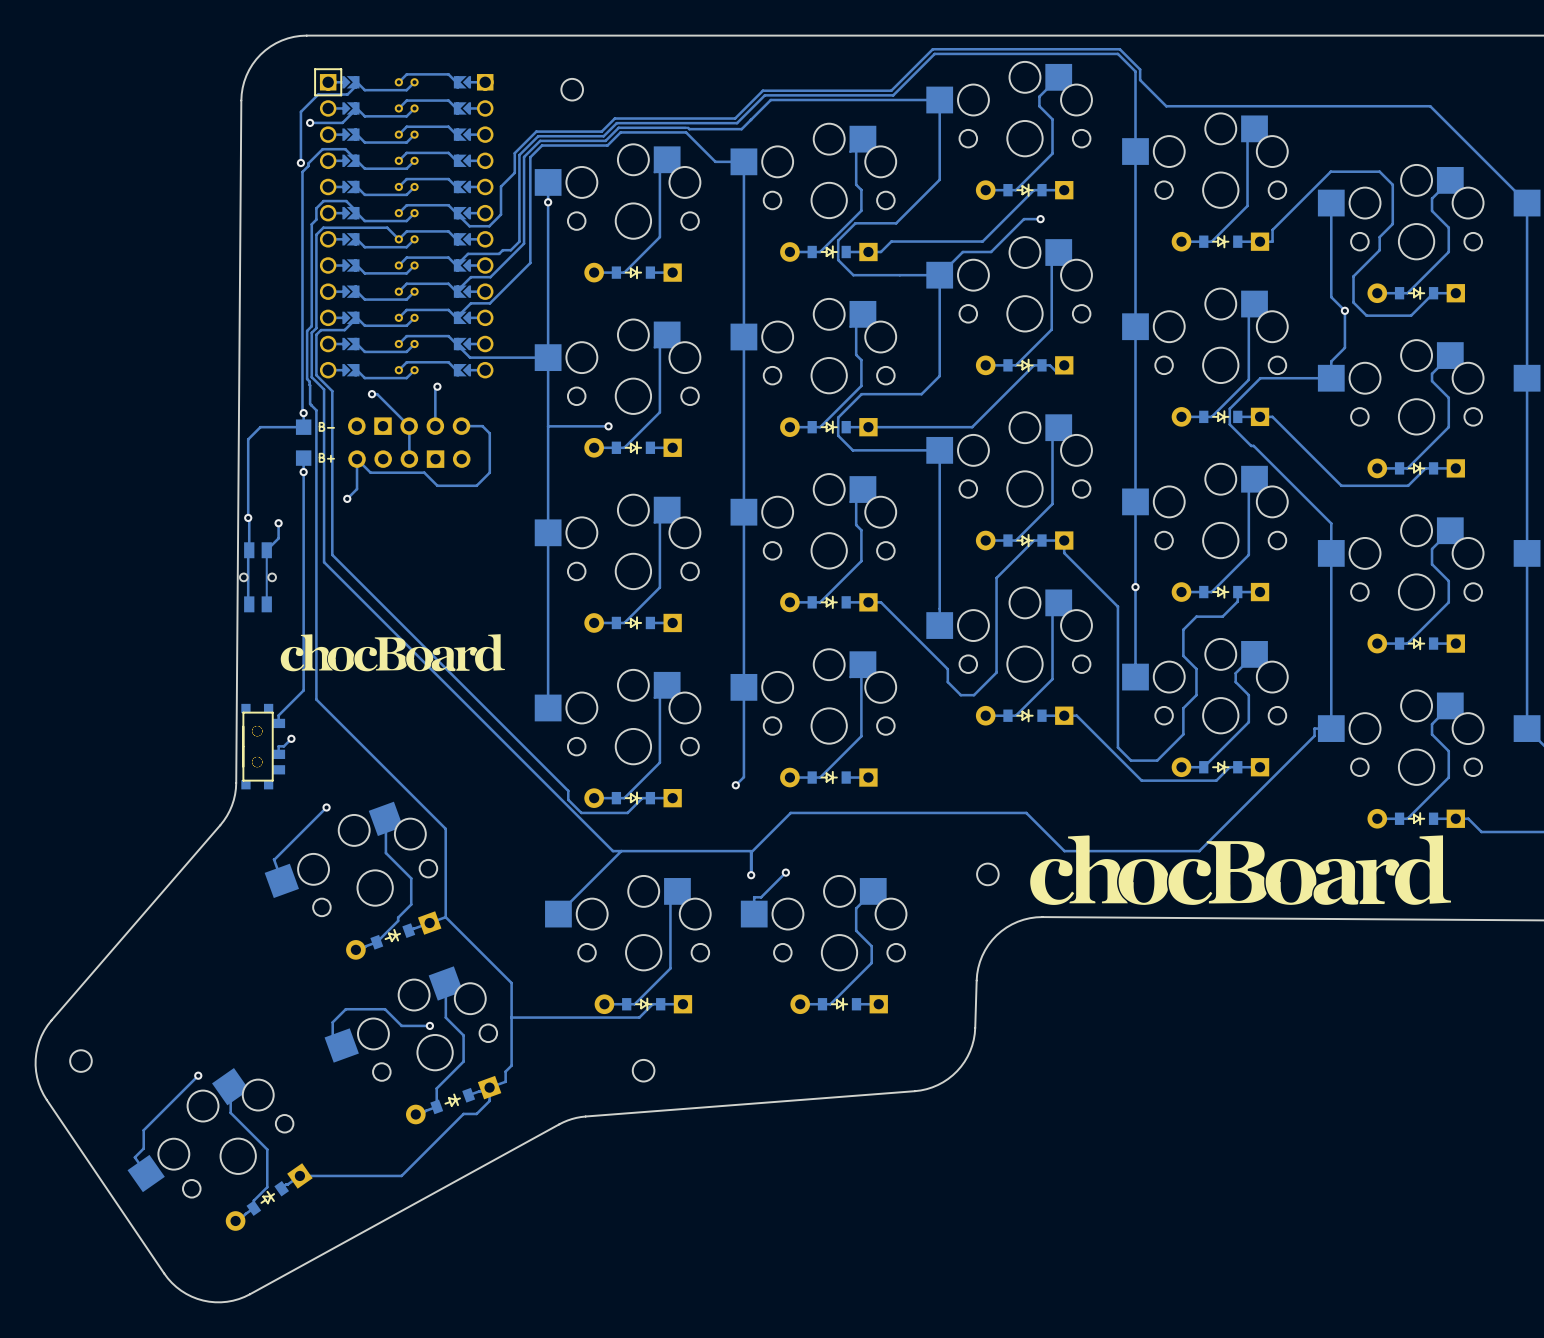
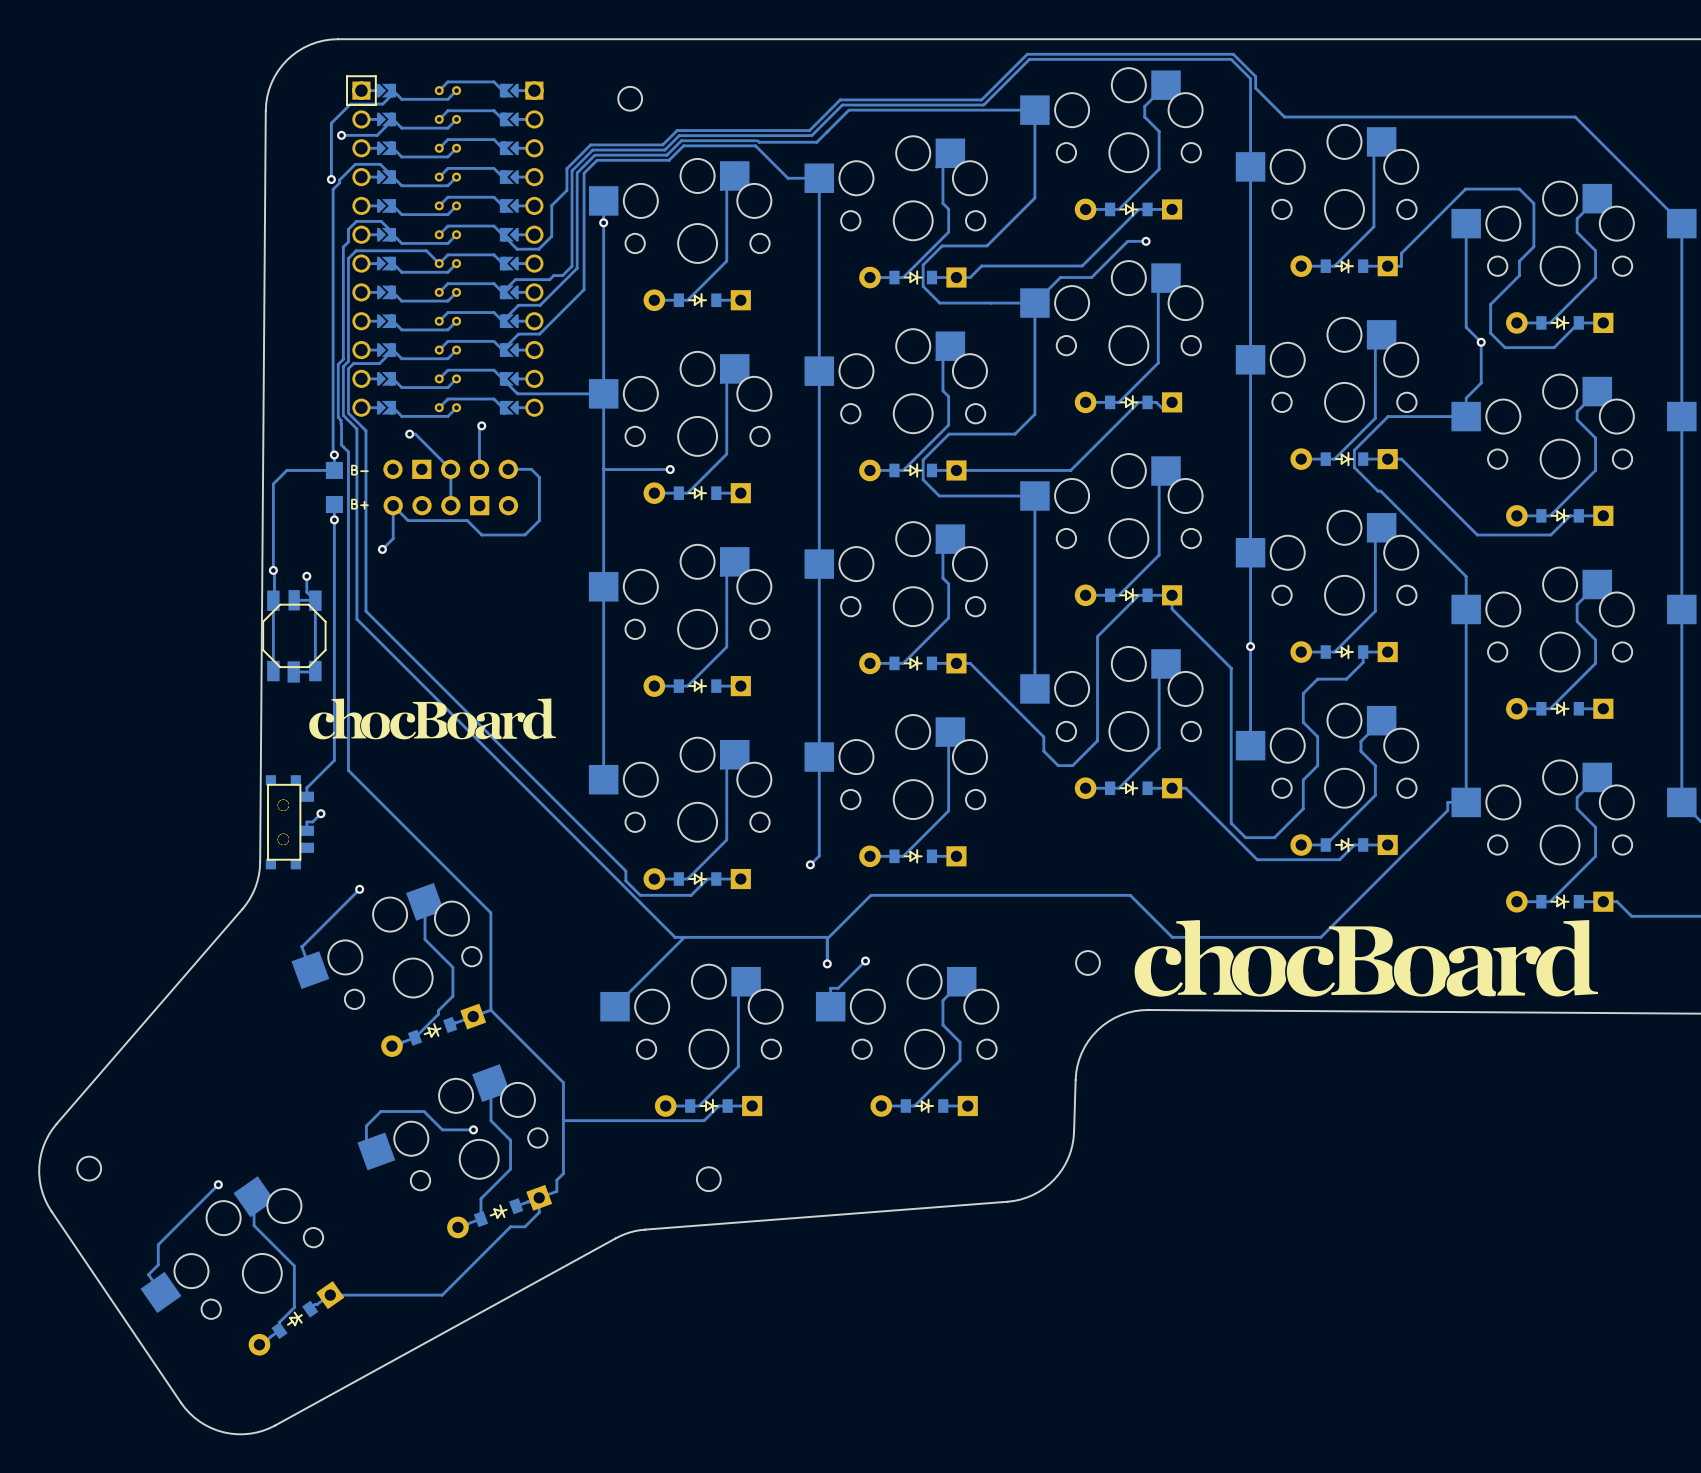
track: (278, 537) (269, 547) -> (306, 592) (315, 600) (315, 671) (293, 671)
track: none -> (314, 600) (294, 600)
part: (249, 550) -> none
track: (266, 550) (266, 604) -> none
part: (266, 550) -> none
part footprint: [239, 573, 276, 582] -> [262, 590, 327, 683]
part: (249, 604) -> none
part: (266, 604) -> none

